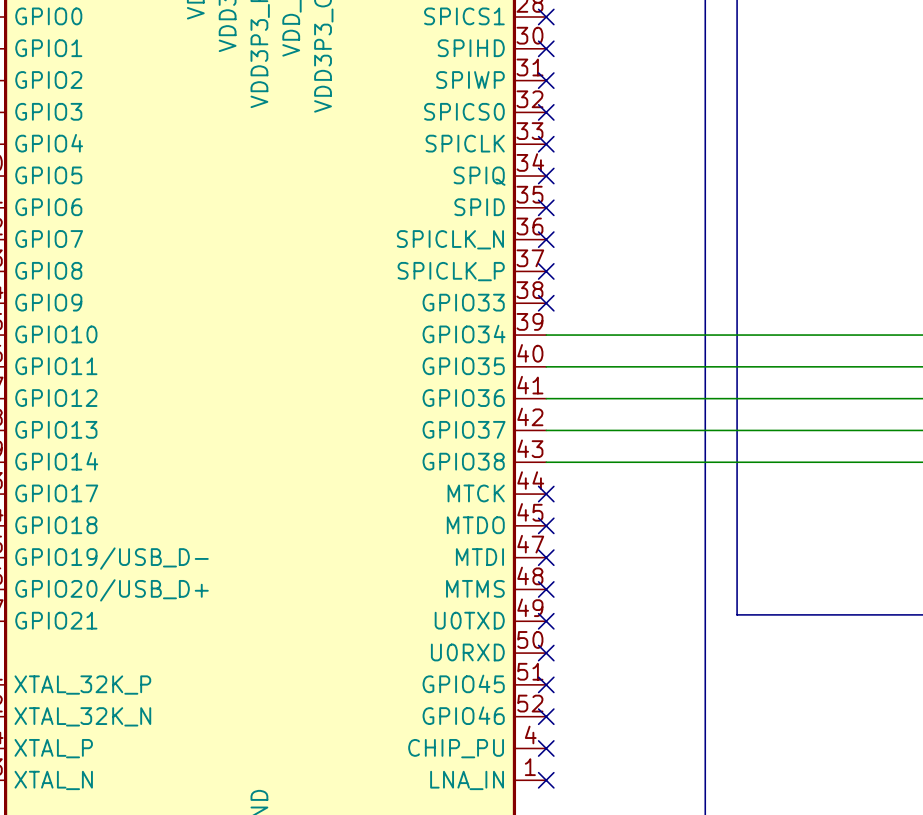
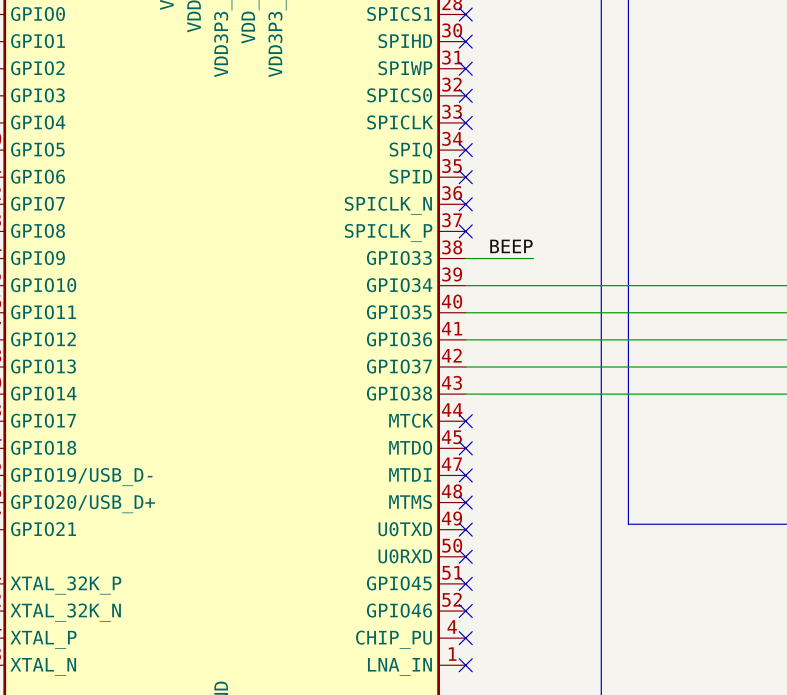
label: none -> BEEP (511, 246)
wire: none -> (465, 258) (533, 258)
no-connect mark: (546, 303) -> none

